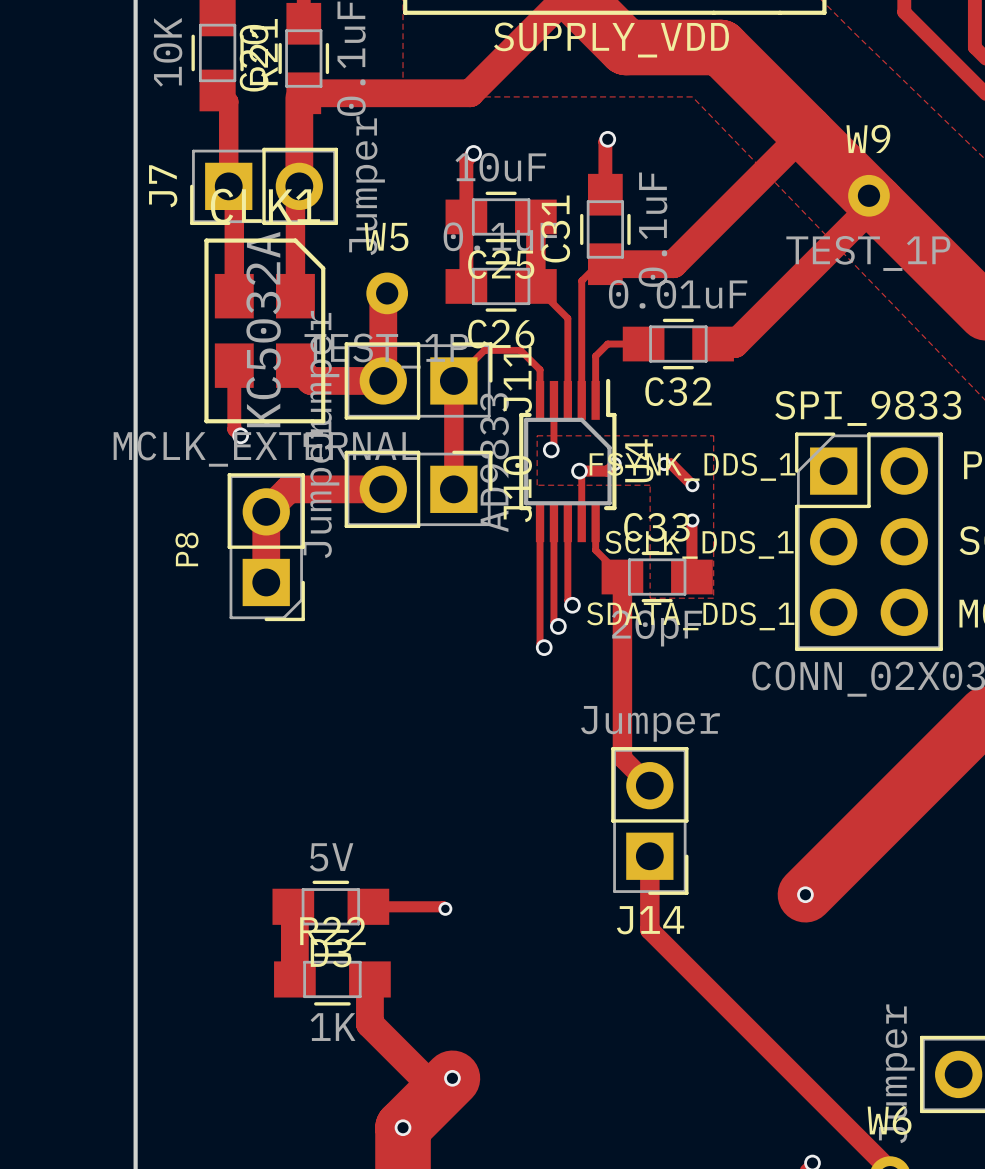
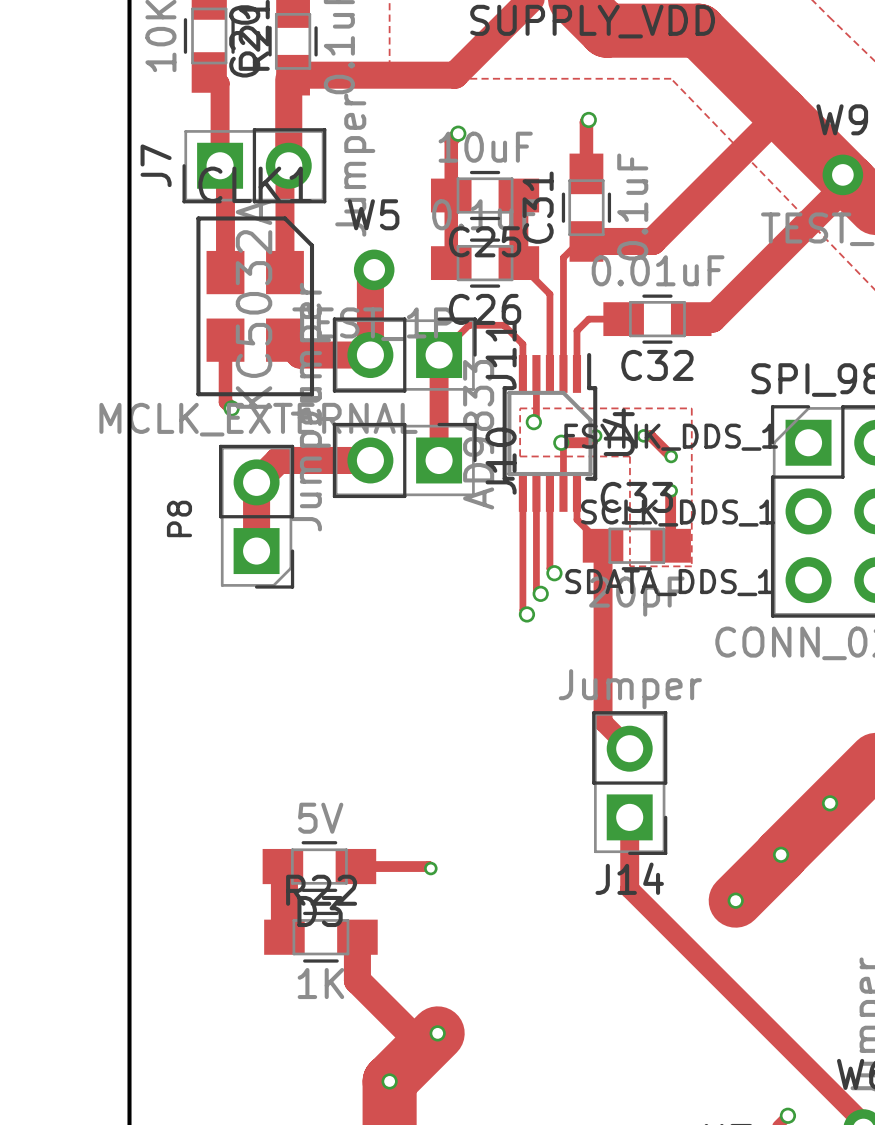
via: none -> (830, 803)
track: none -> (781, 855) (735, 900)
via: none -> (735, 900)

